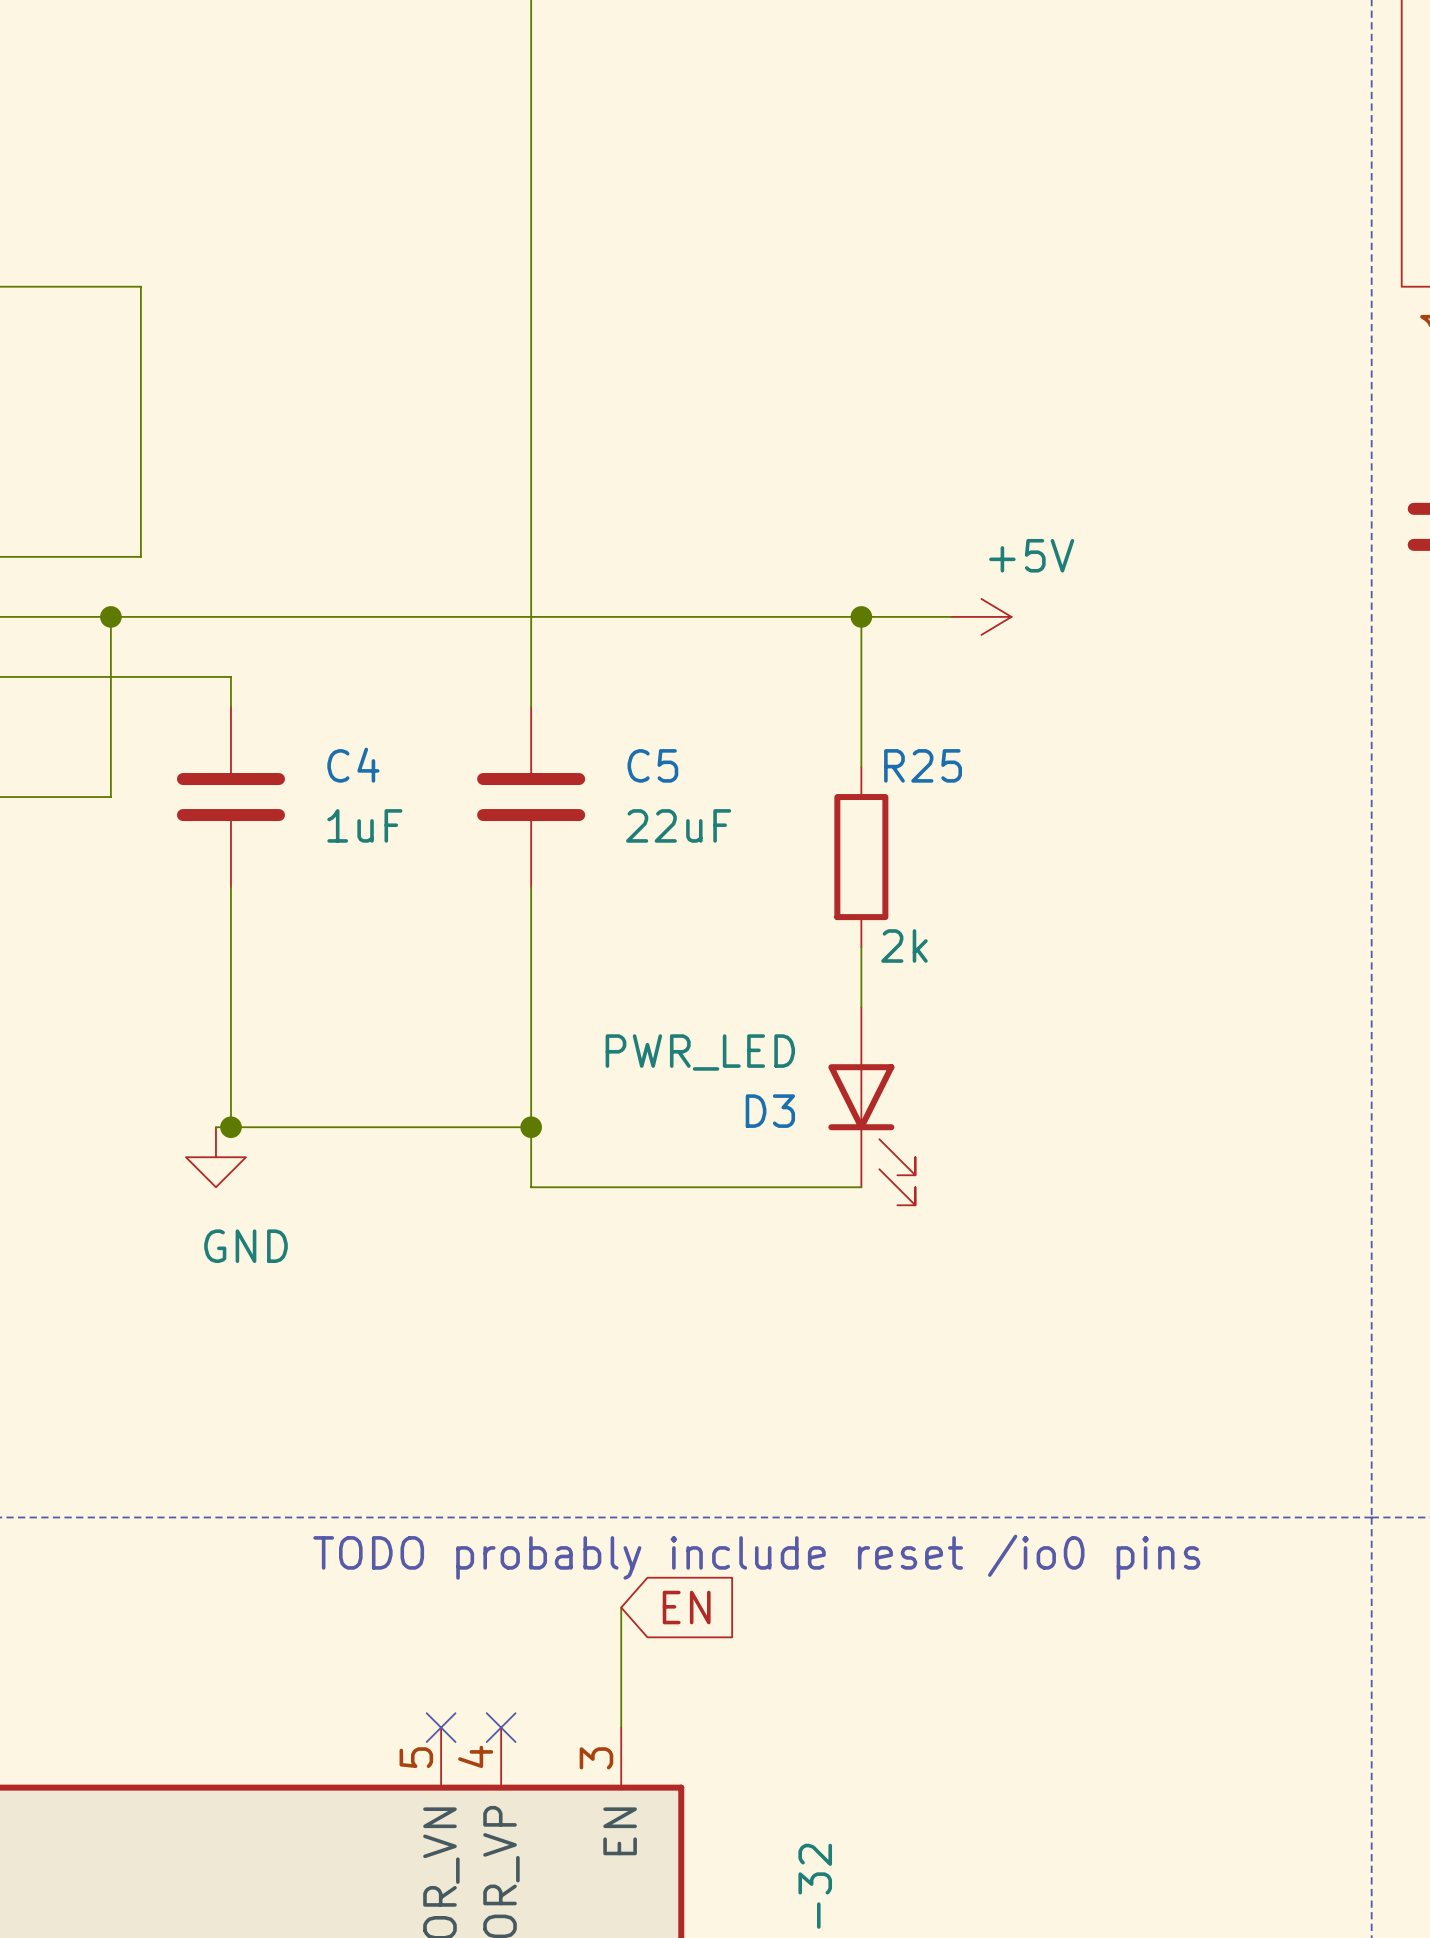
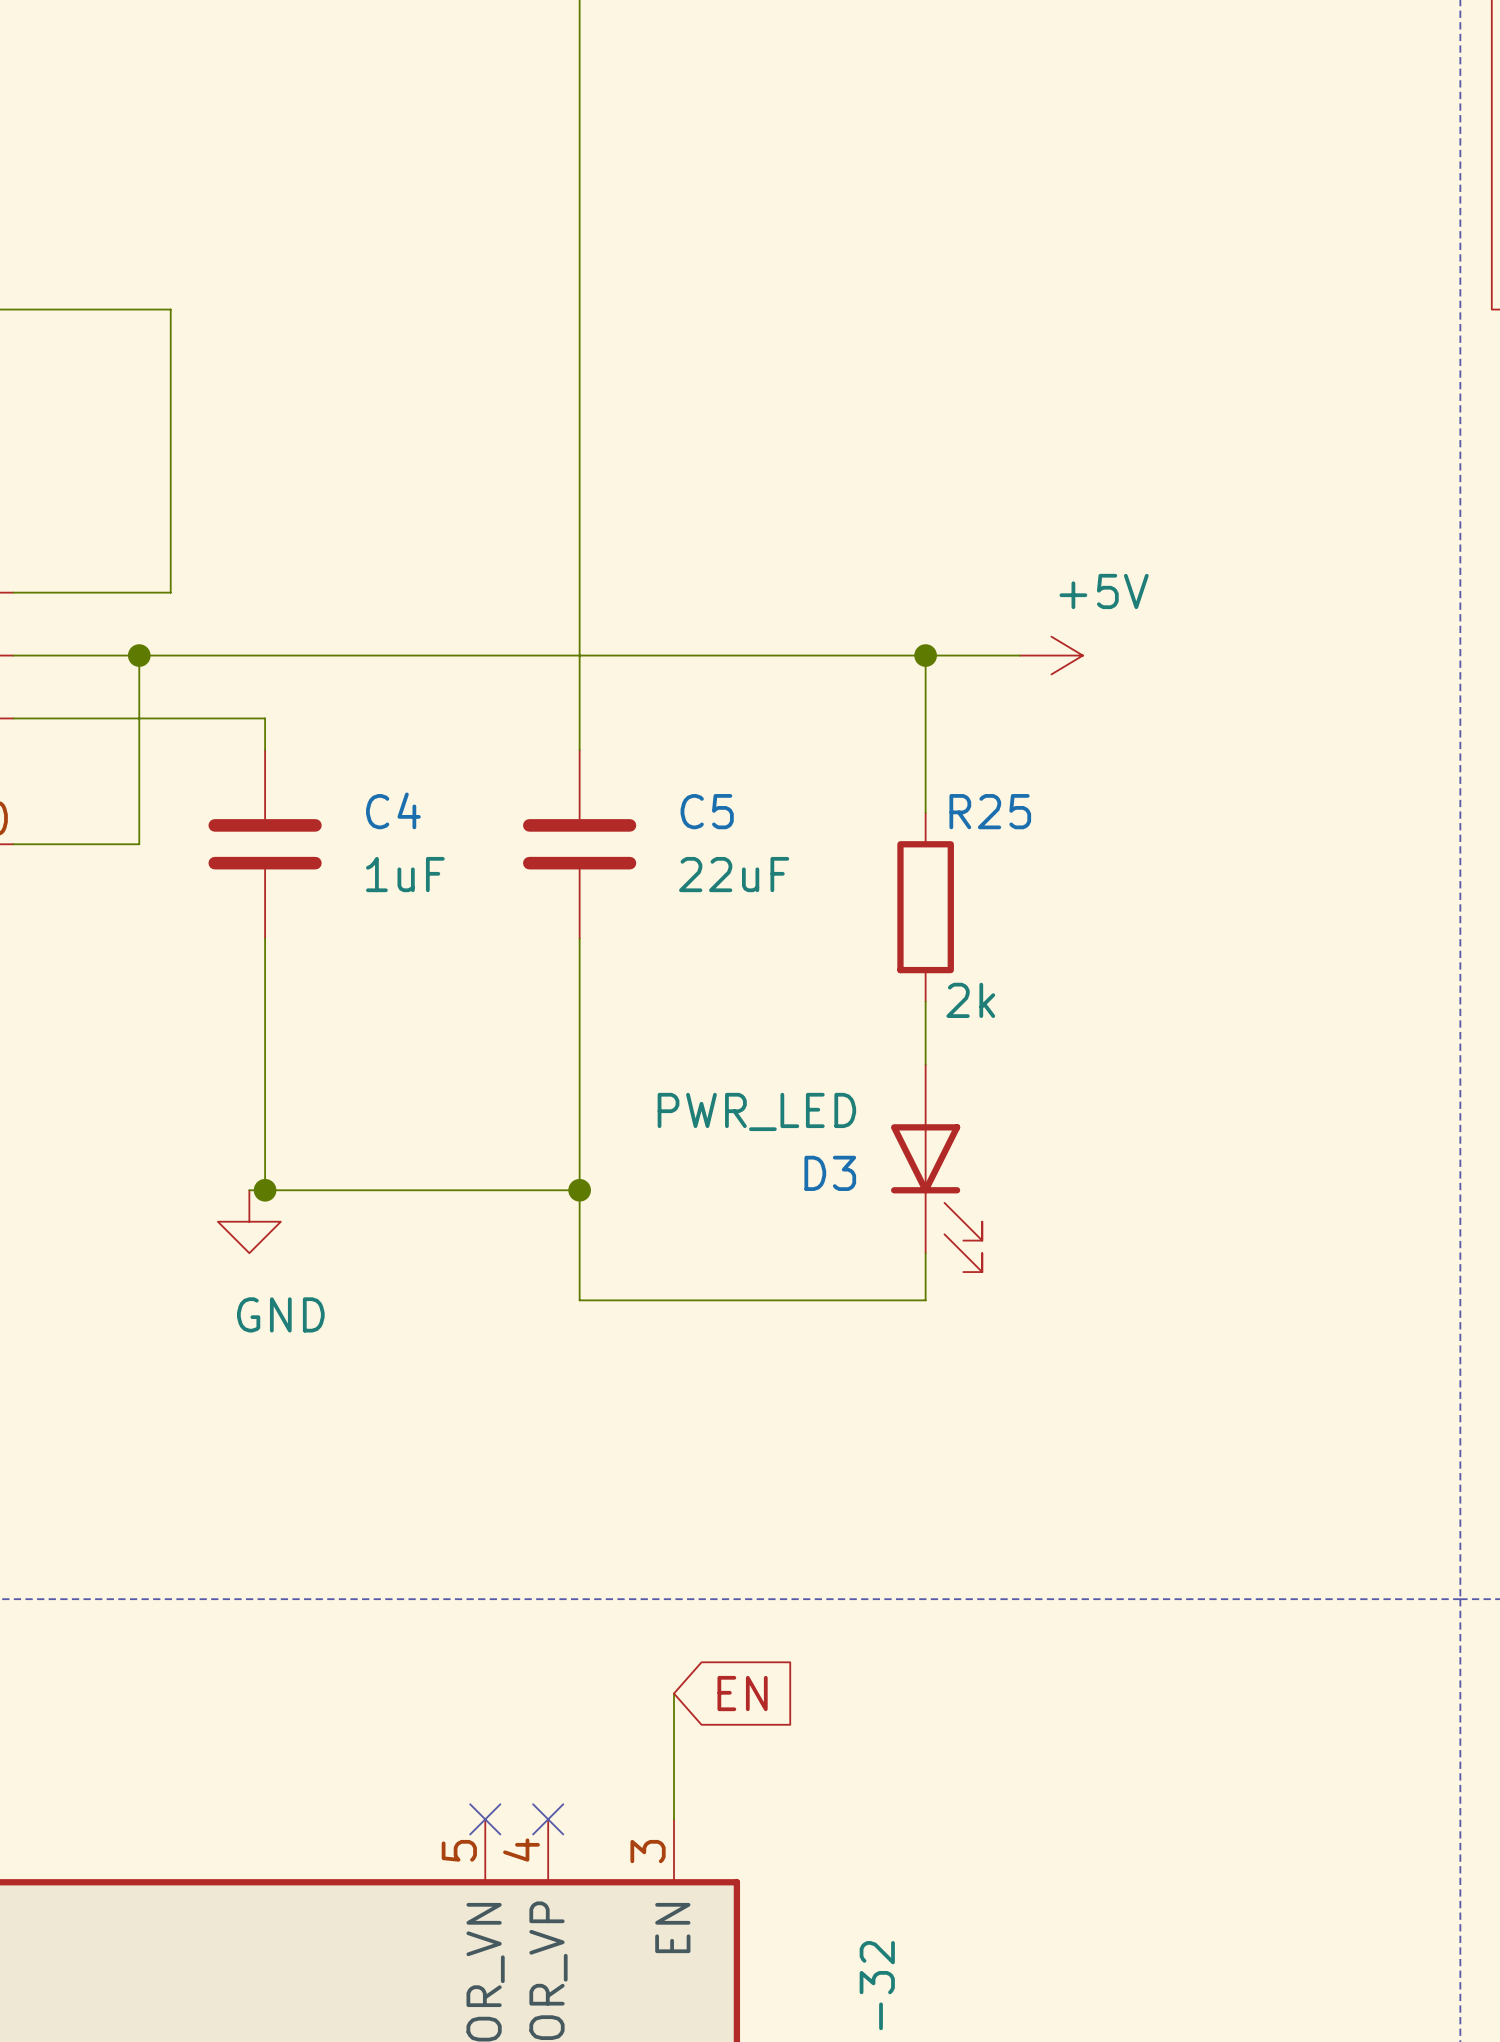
wire: (531, 1187) (861, 1187) -> (579, 1253) (579, 1300) (925, 1300) (925, 1253)
text: TODO probably include reset /io0 pins (756, 1557) -> none

